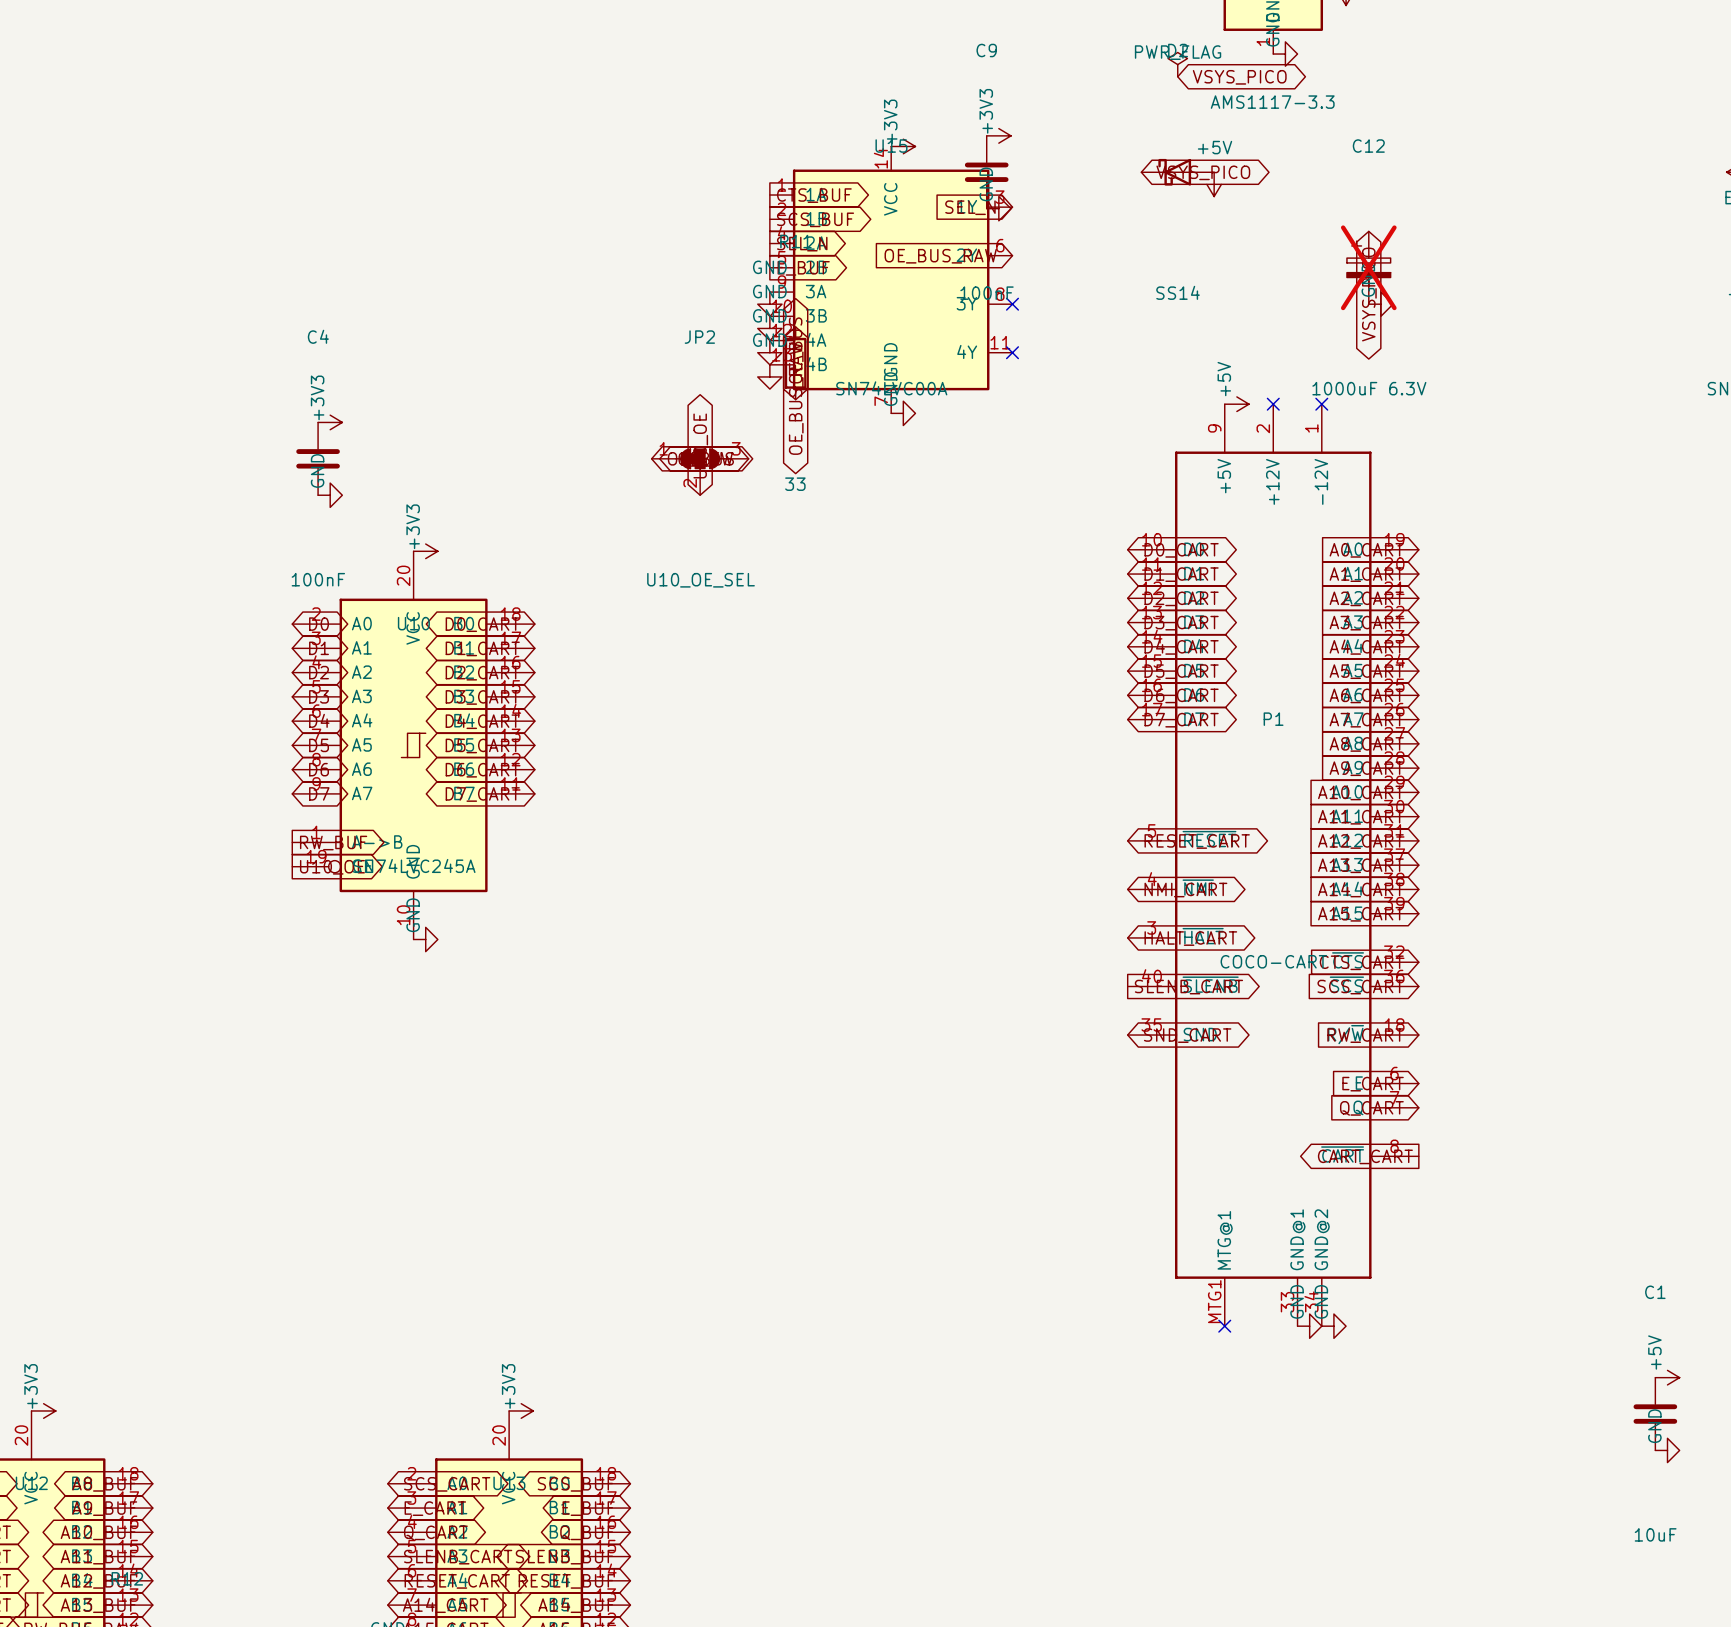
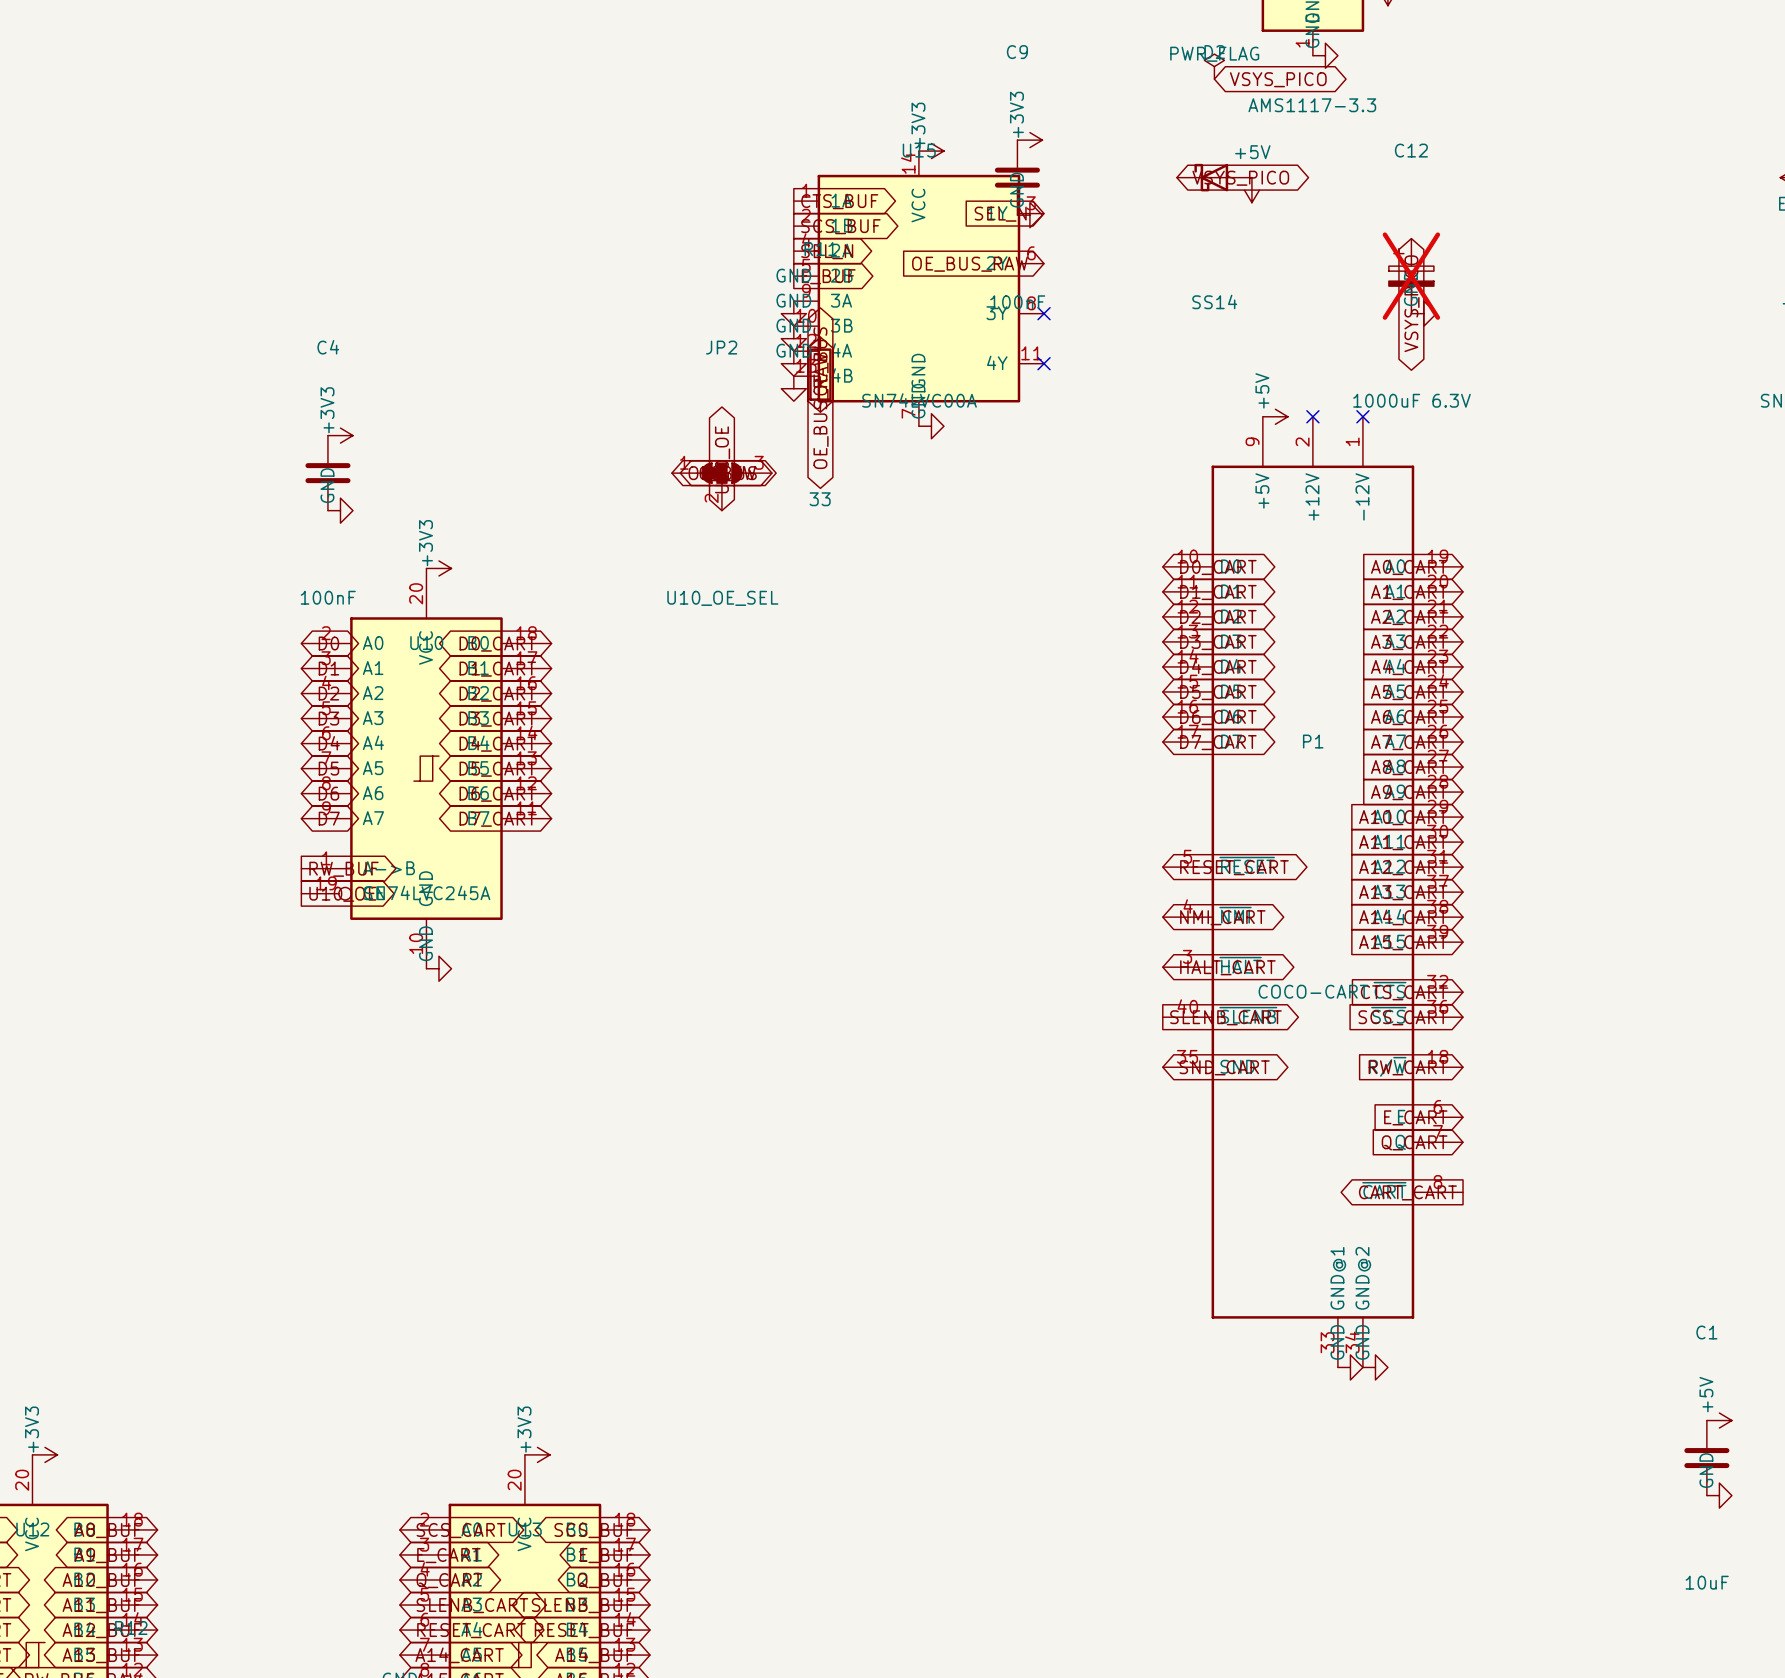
P1 symbol: [1127, 404, 1419, 1327] -> [1162, 416, 1464, 1368]
no-connect mark: (1224, 1326) -> none

